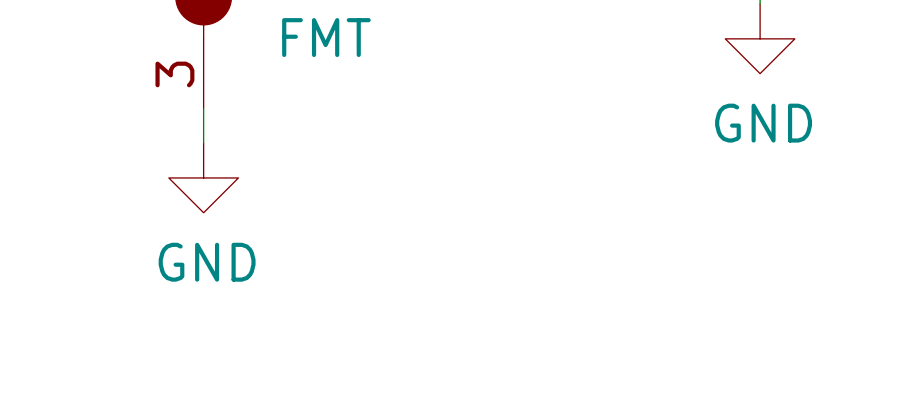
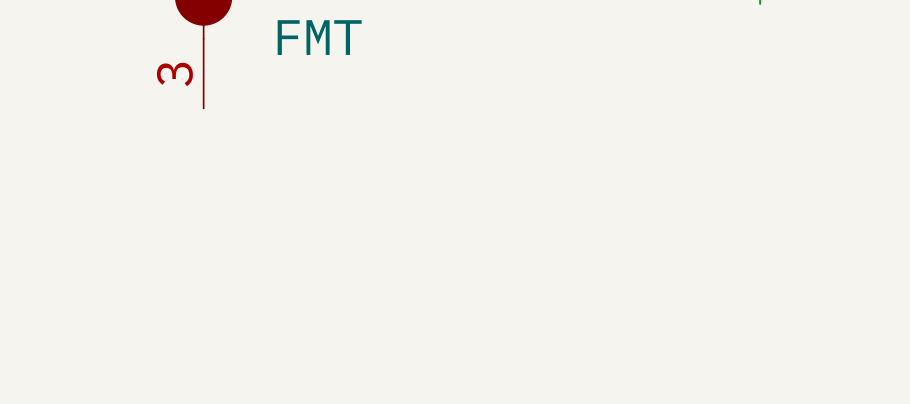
power symbol: GND (760, 38) -> none
wire: (203, 108) (203, 143) -> none
power symbol: GND (203, 177) -> none

